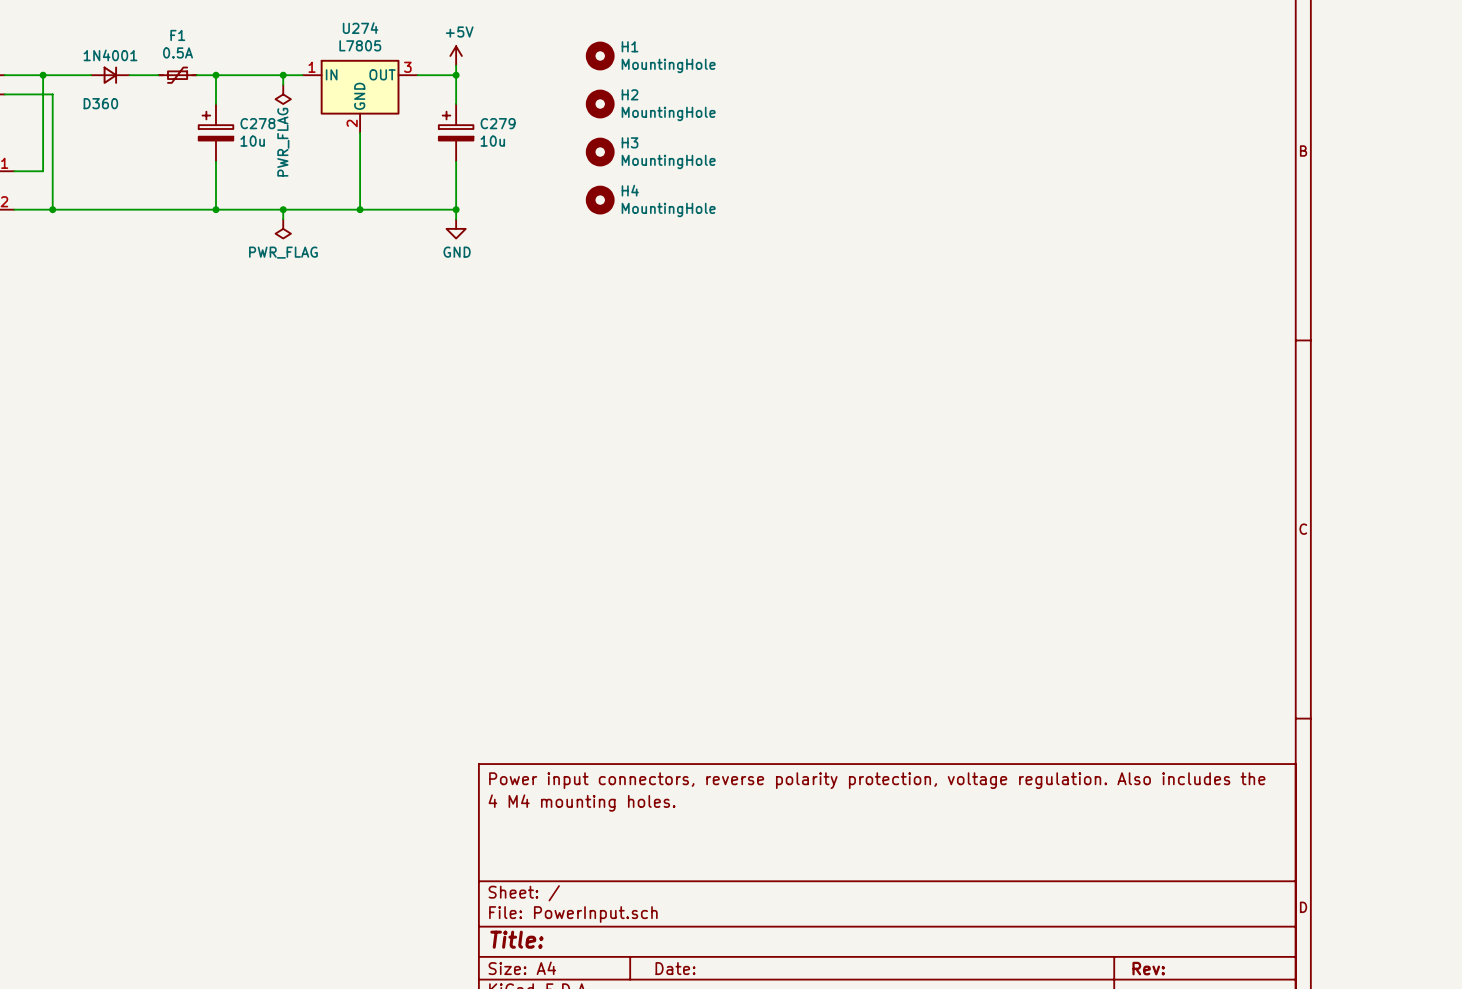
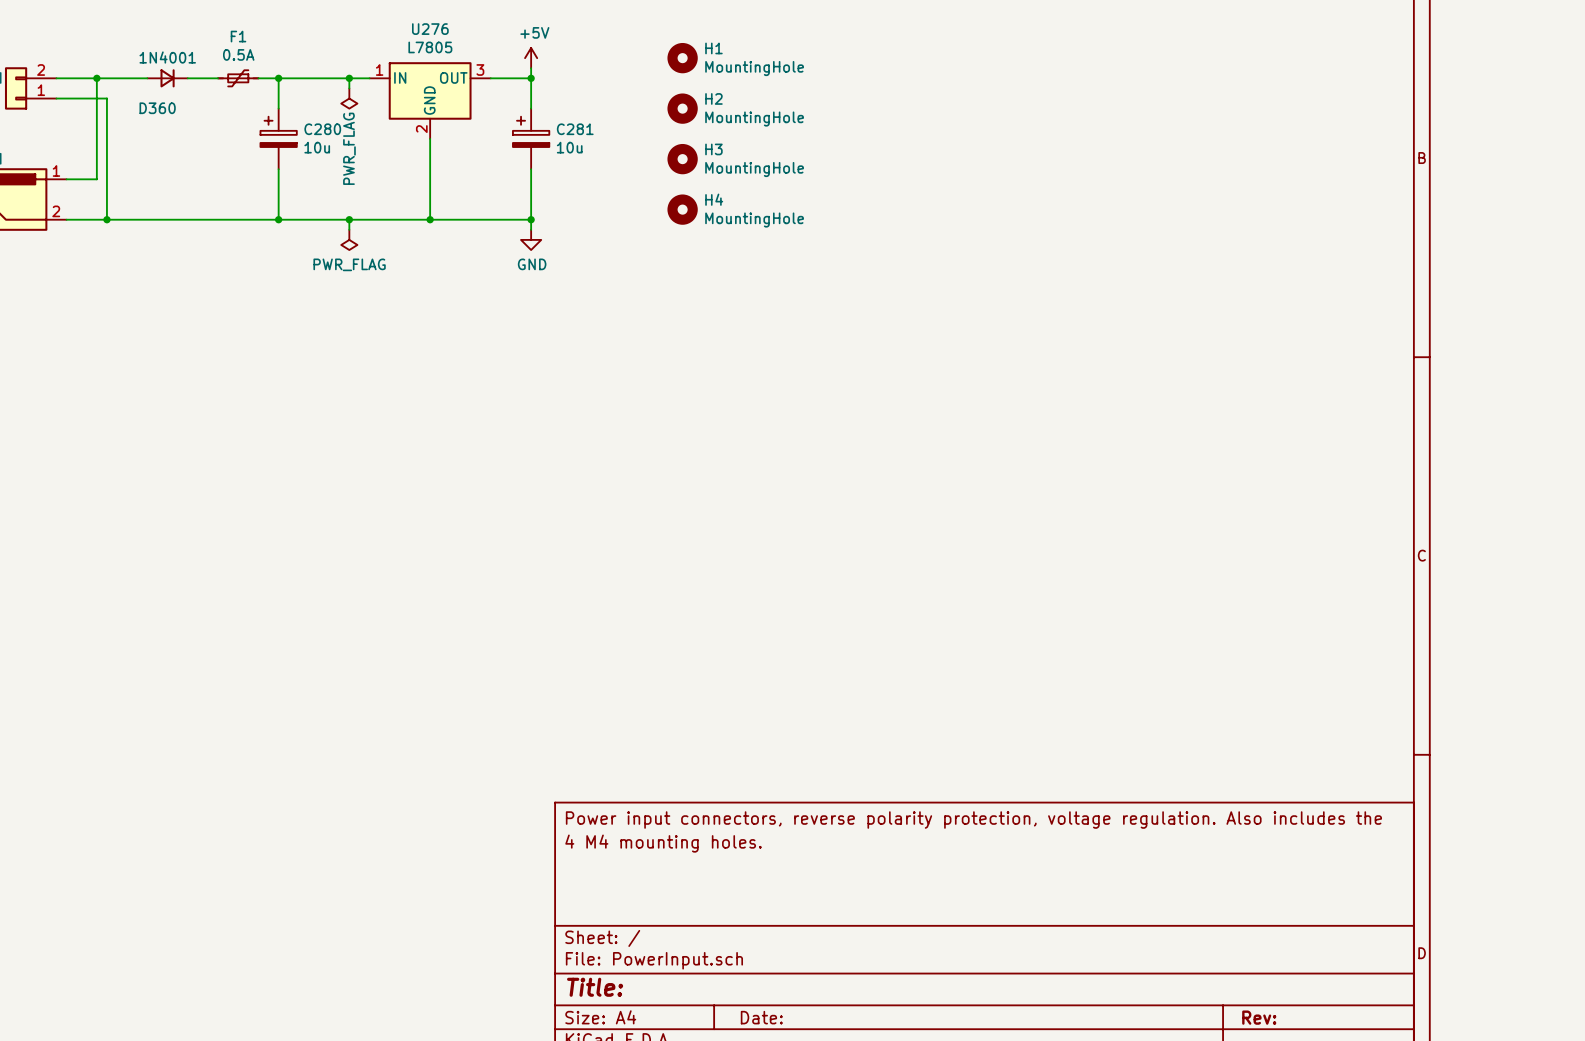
U274 name: U274 (360, 28) -> U276 (430, 29)
C278 name: C278 (257, 123) -> C280 (322, 129)
C279 name: C279 (498, 123) -> C281 (575, 129)

